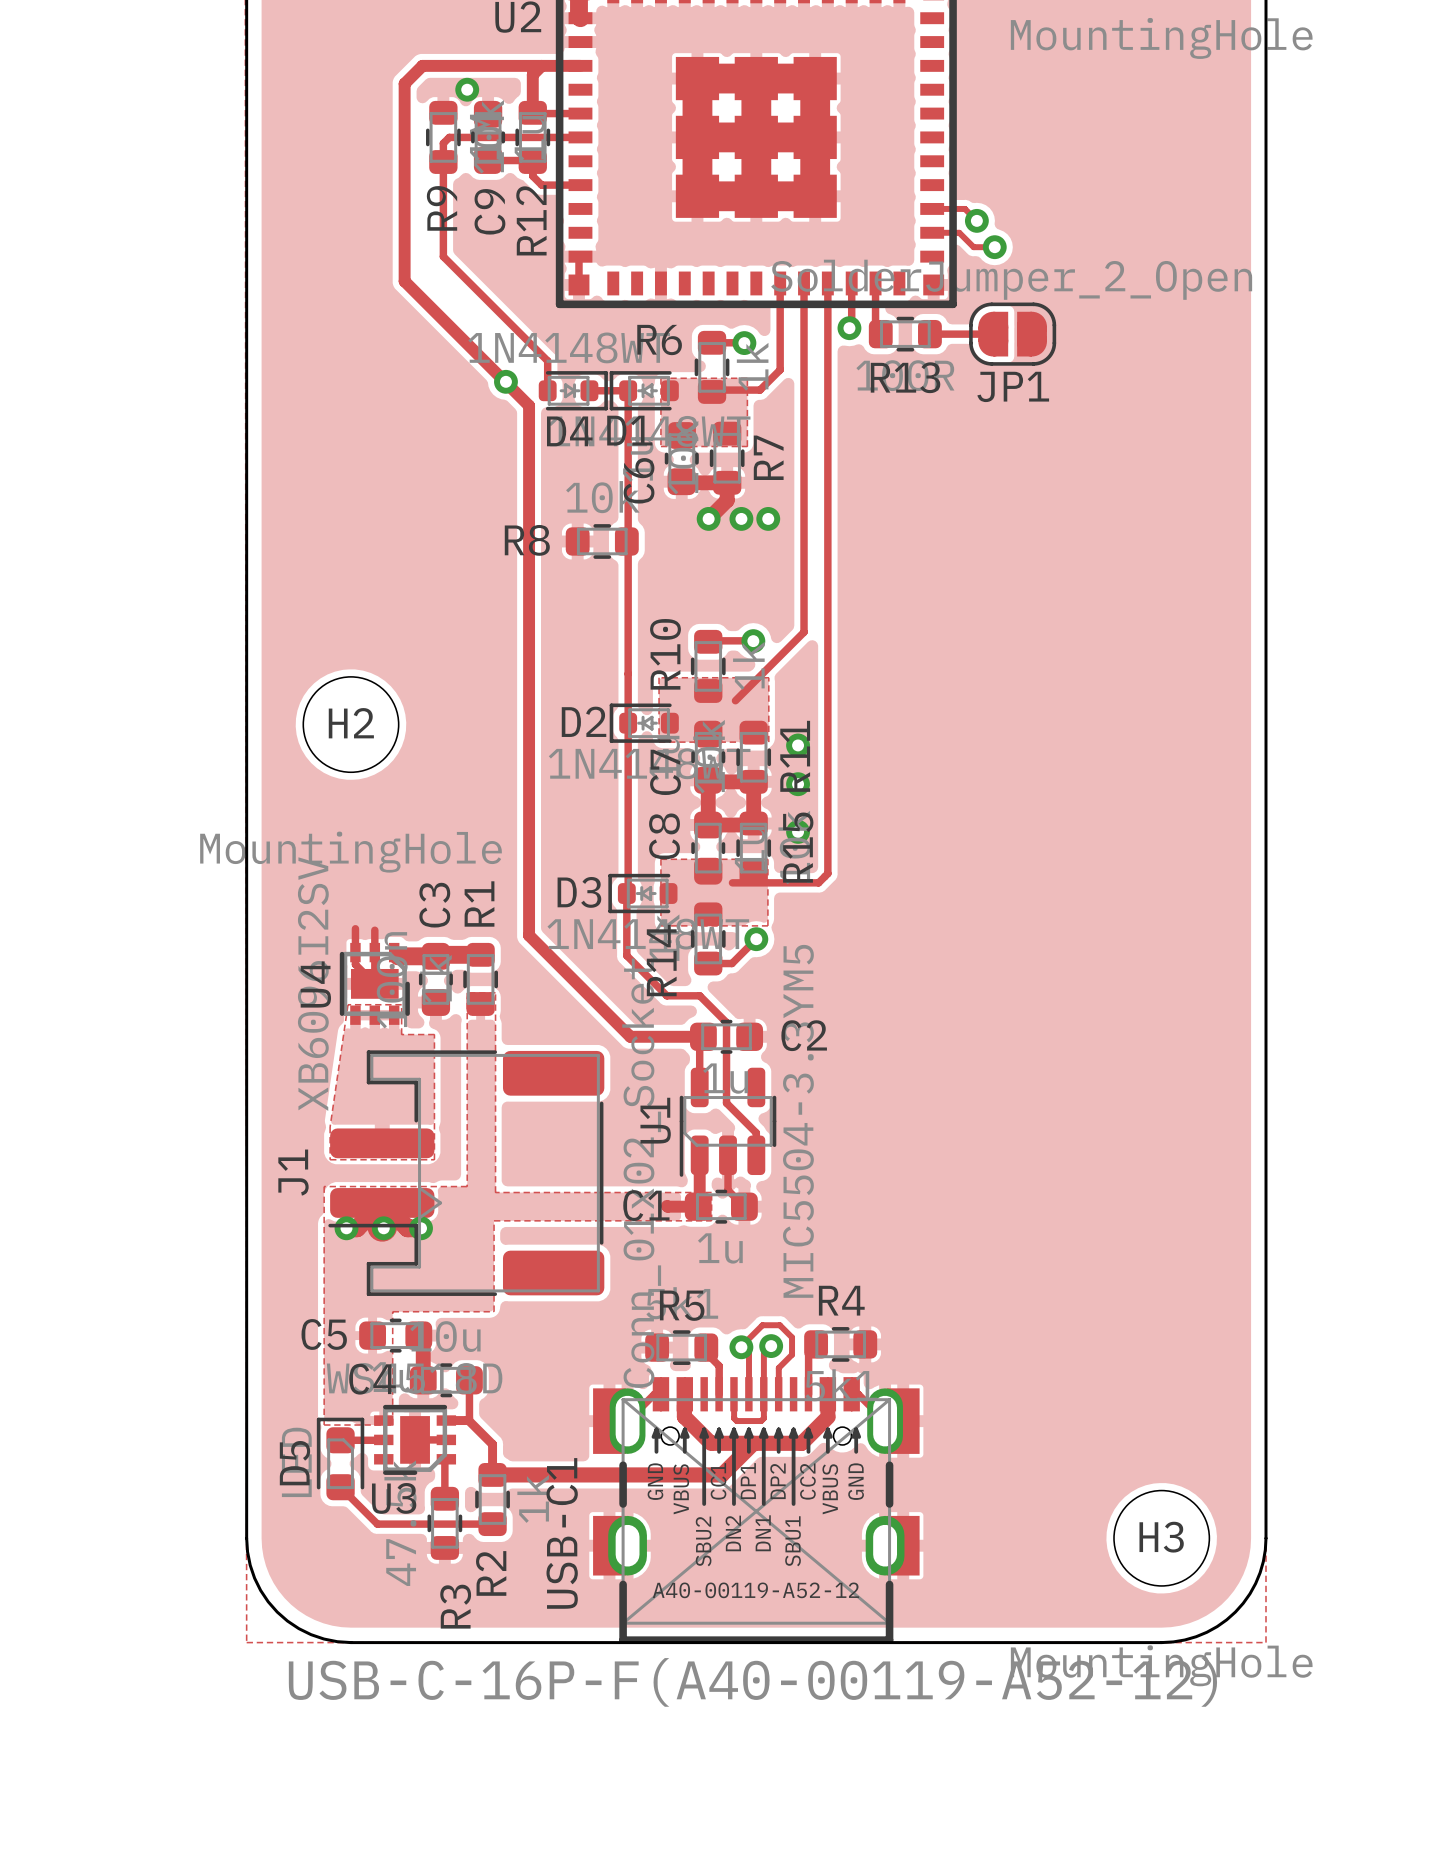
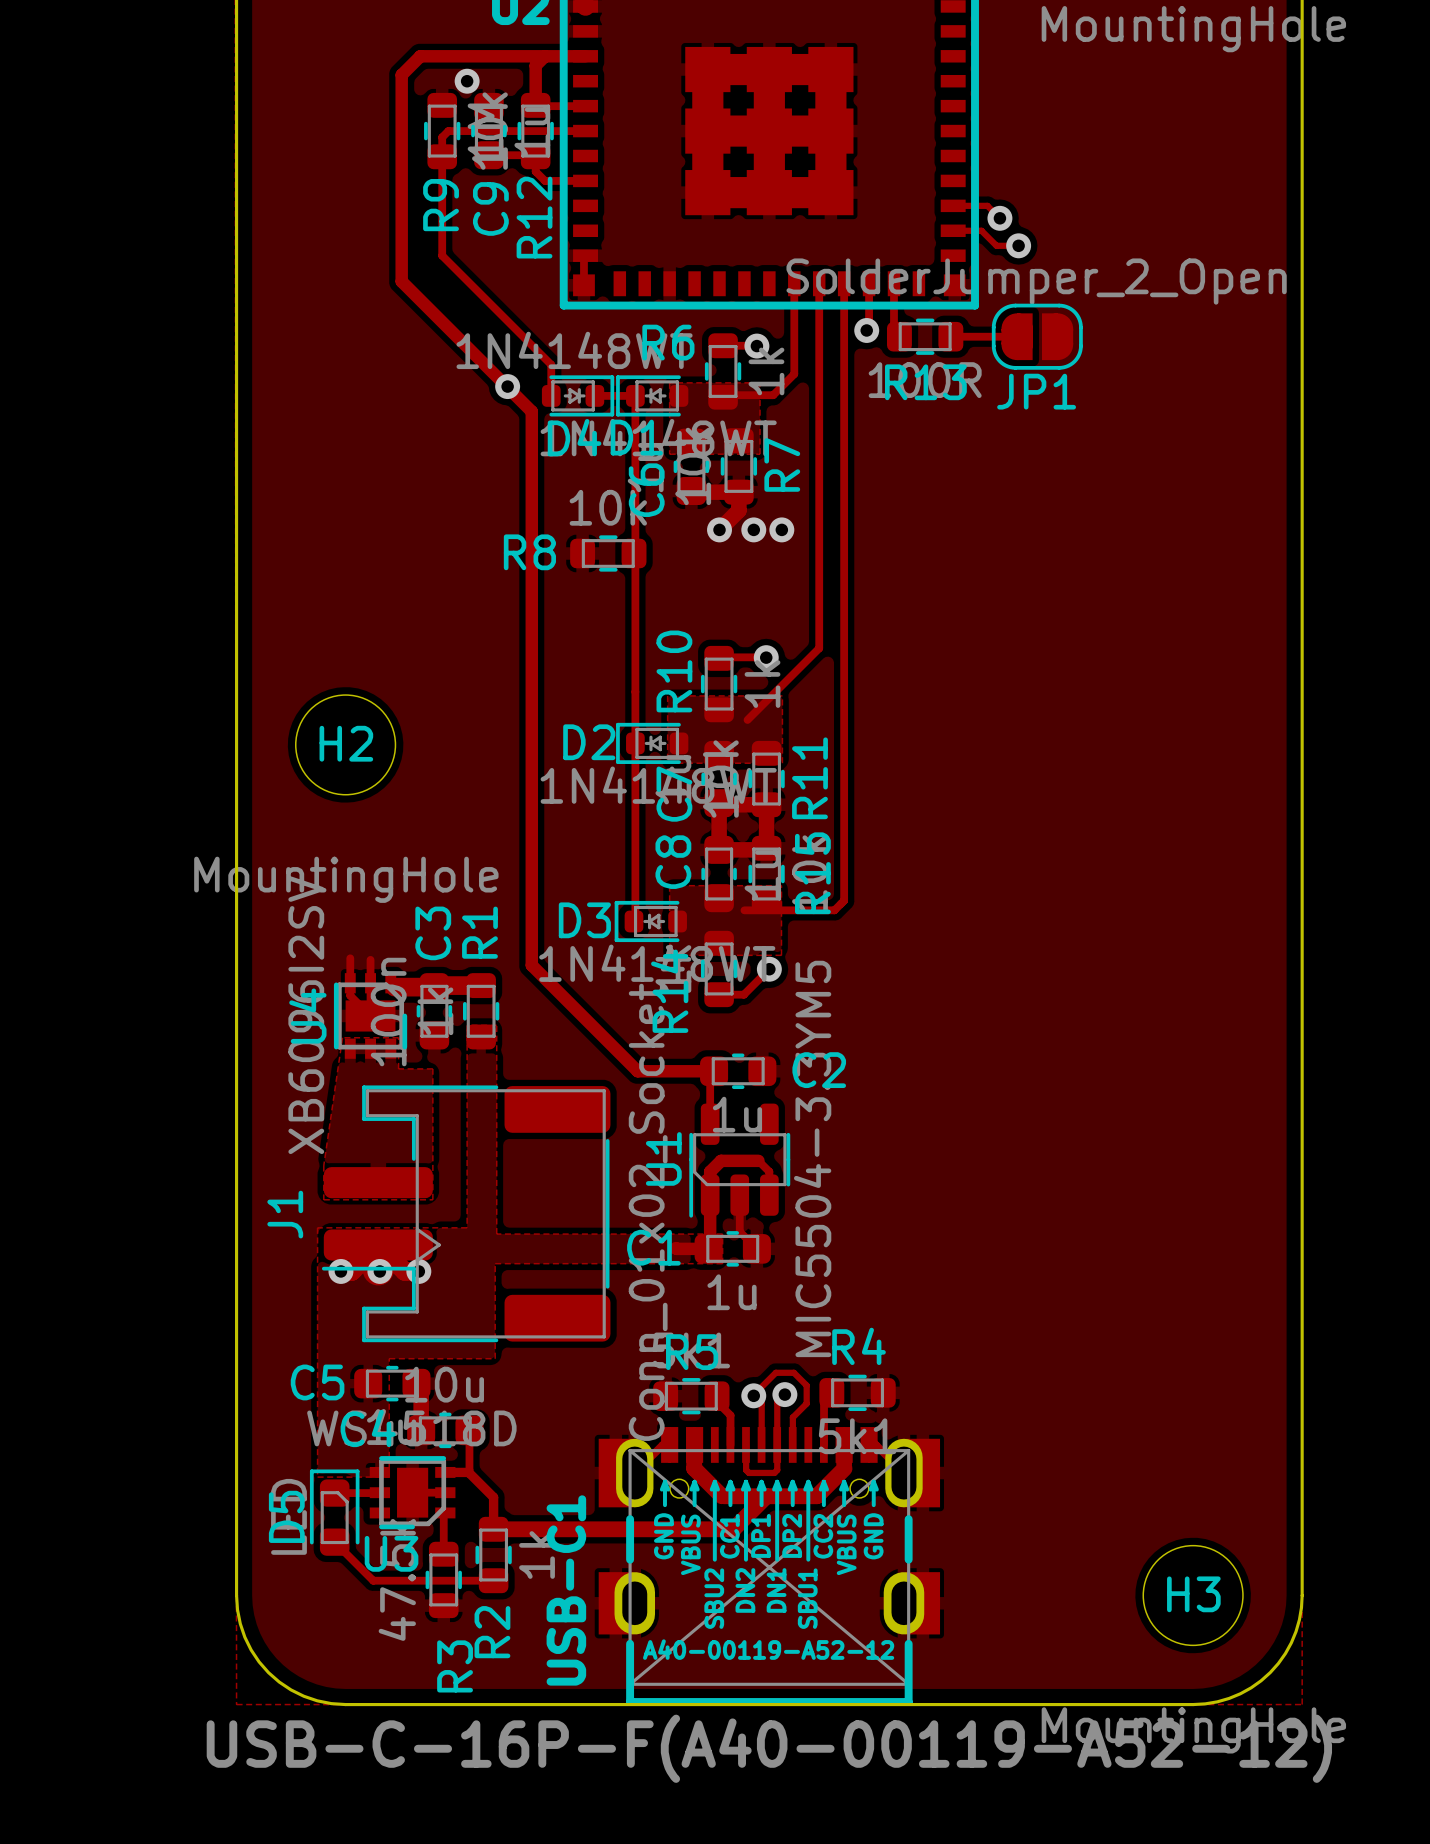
via: (798, 745) -> none
via: (798, 784) -> none
via: (798, 831) -> none
track: (626, 893) (626, 955) (666, 995) (699, 995) (726, 1022) (726, 1103) (745, 1122) -> (710, 1195) (710, 1171) (721, 1160) (758, 1160)

